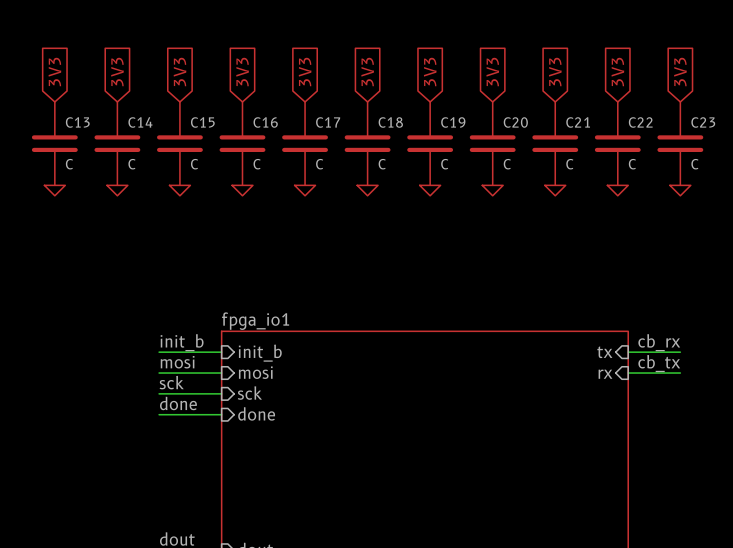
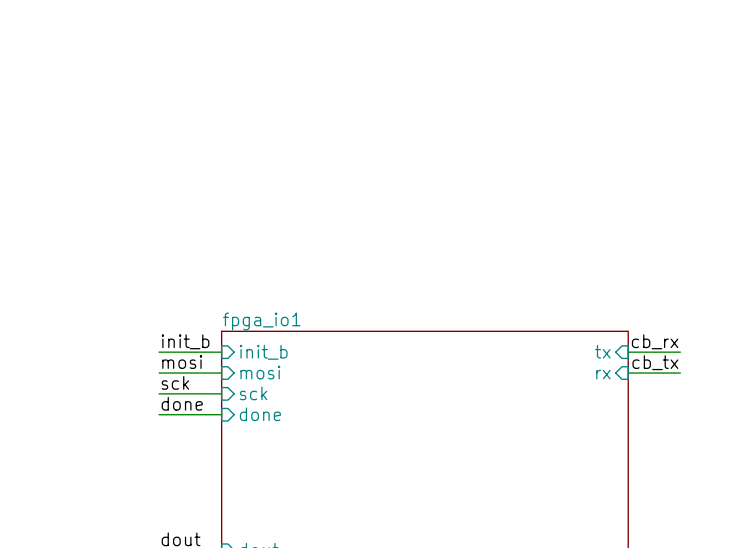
global label: 3V3 (54, 72) -> none
global label: 3V3 (117, 72) -> none
global label: 3V3 (180, 72) -> none
global label: 3V3 (242, 72) -> none
global label: 3V3 (305, 72) -> none
global label: 3V3 (367, 72) -> none
global label: 3V3 (430, 72) -> none
global label: 3V3 (492, 72) -> none
global label: 3V3 (555, 72) -> none
global label: 3V3 (617, 72) -> none
global label: 3V3 (680, 72) -> none
C13: C (54, 143) -> none
C14: C (117, 143) -> none
C15: C (179, 143) -> none
C16: C (242, 143) -> none
C17: C (305, 143) -> none
C18: C (367, 143) -> none
C19: C (430, 143) -> none
C20: C (492, 143) -> none
C21: C (555, 143) -> none
C22: C (617, 143) -> none
C23: C (680, 143) -> none
power symbol: (54, 190) -> none
power symbol: (117, 190) -> none
power symbol: (179, 190) -> none
power symbol: (242, 190) -> none
power symbol: (305, 190) -> none
power symbol: (367, 190) -> none
power symbol: (430, 190) -> none
power symbol: (492, 190) -> none
power symbol: (555, 190) -> none
power symbol: (617, 190) -> none
power symbol: (680, 190) -> none

